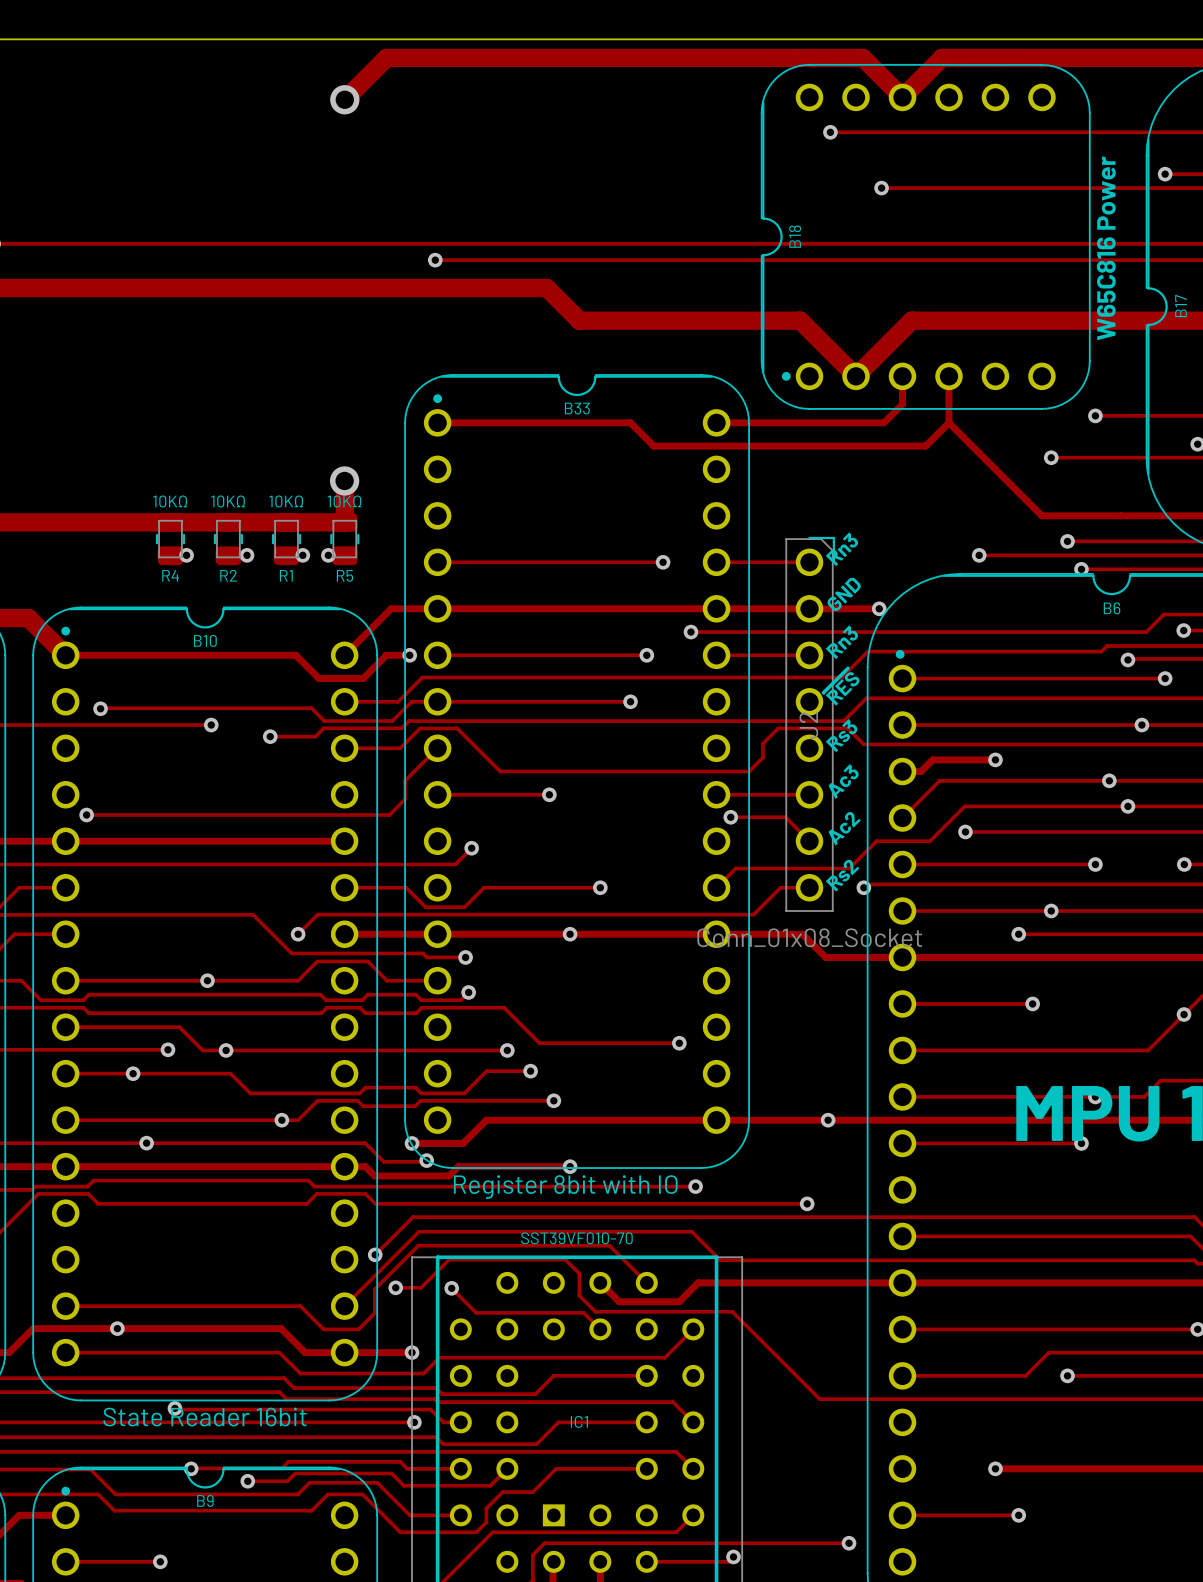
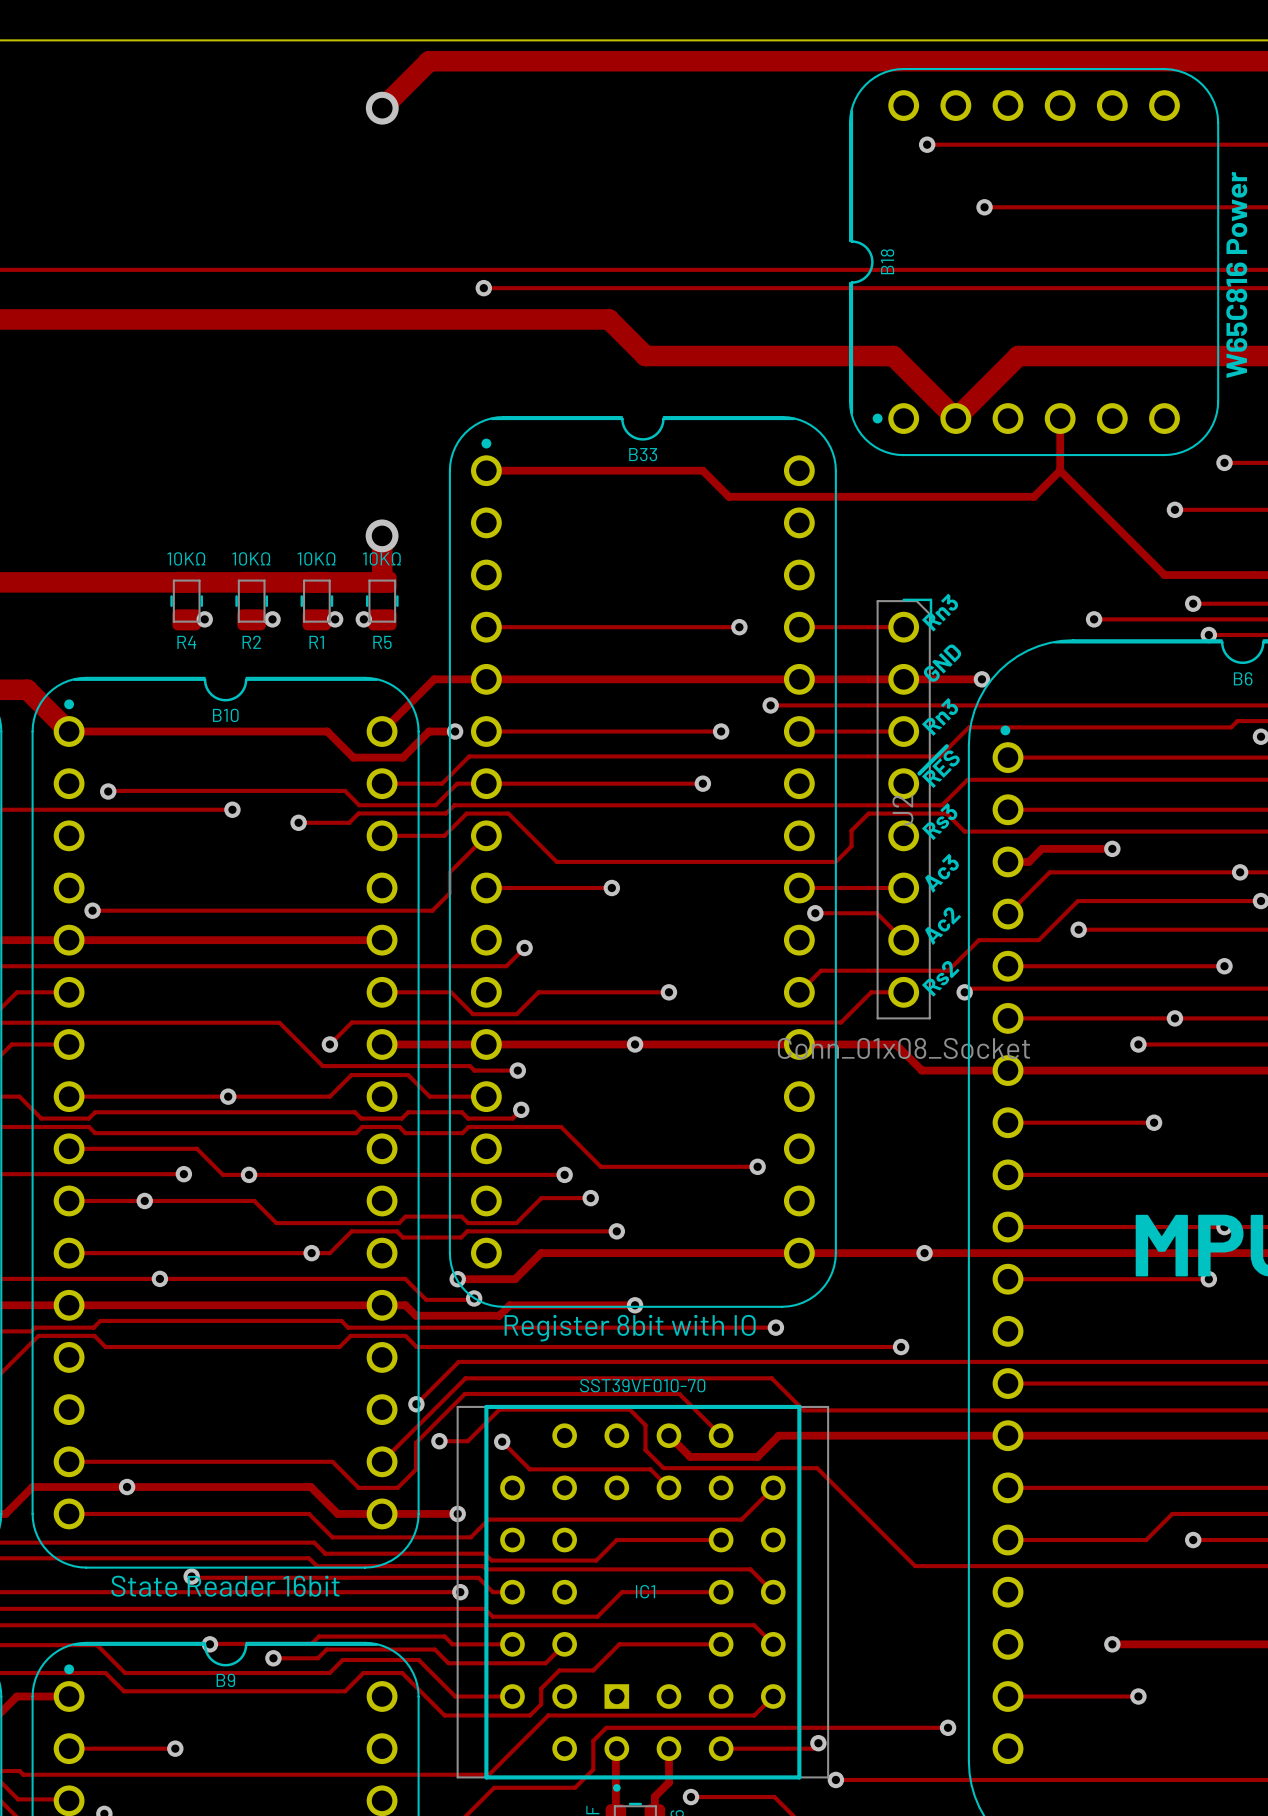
track: (862, 57) (902, 97) (942, 57) -> (963, 61) (1052, 61)
track: (902, 376) (902, 404) (883, 422) (716, 422) -> none

